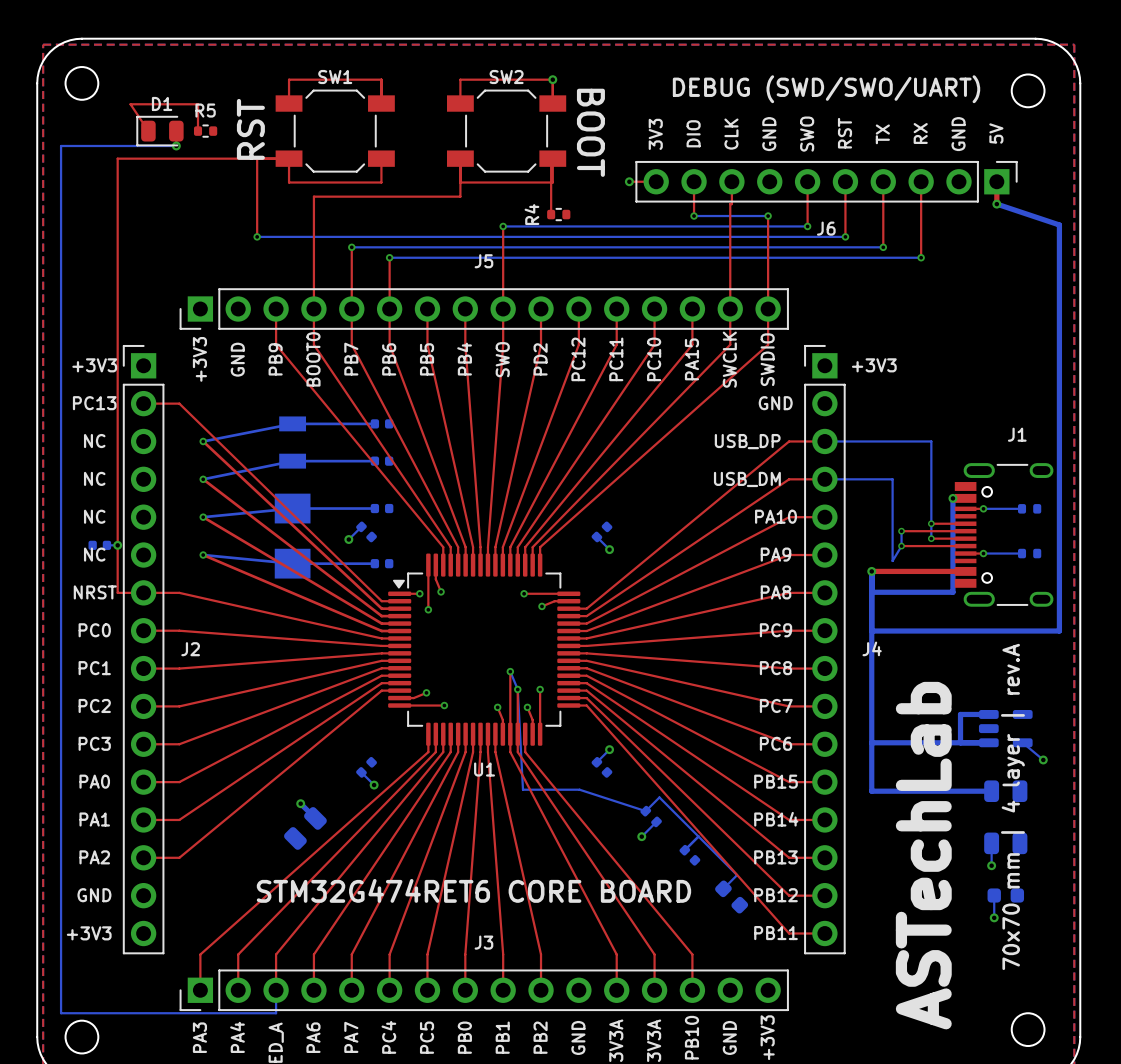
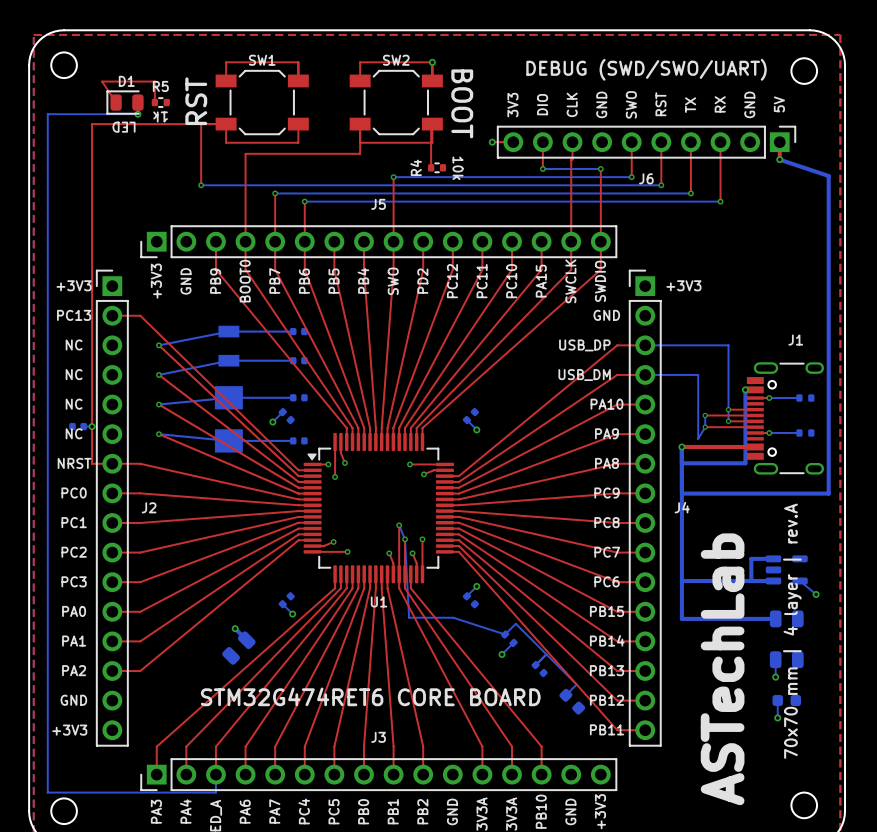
text: none -> 1k (160, 116)
text: none -> LED (124, 127)
text: none -> 10k (458, 168)

